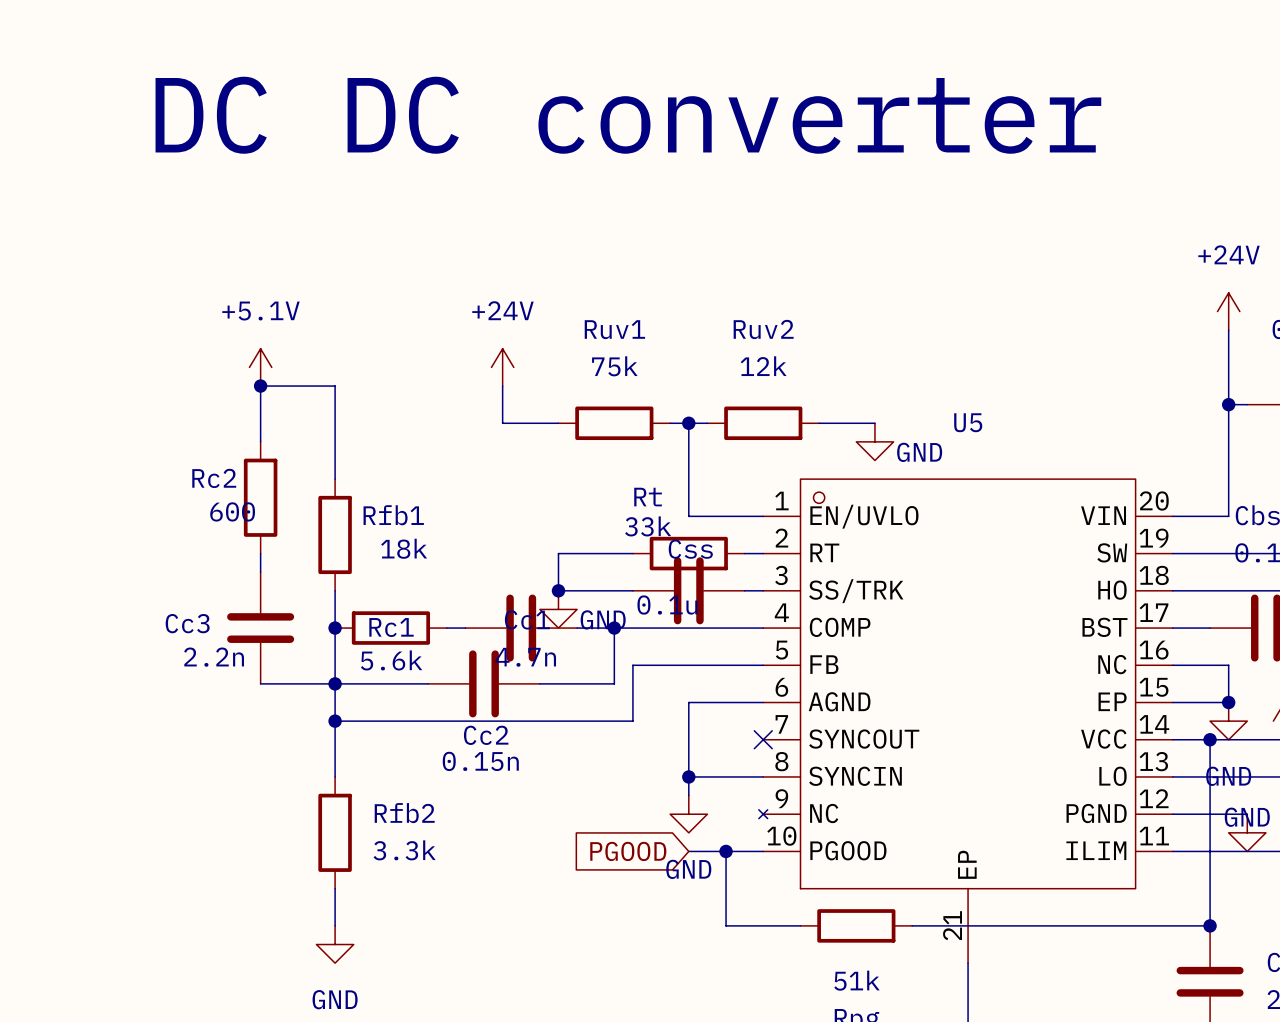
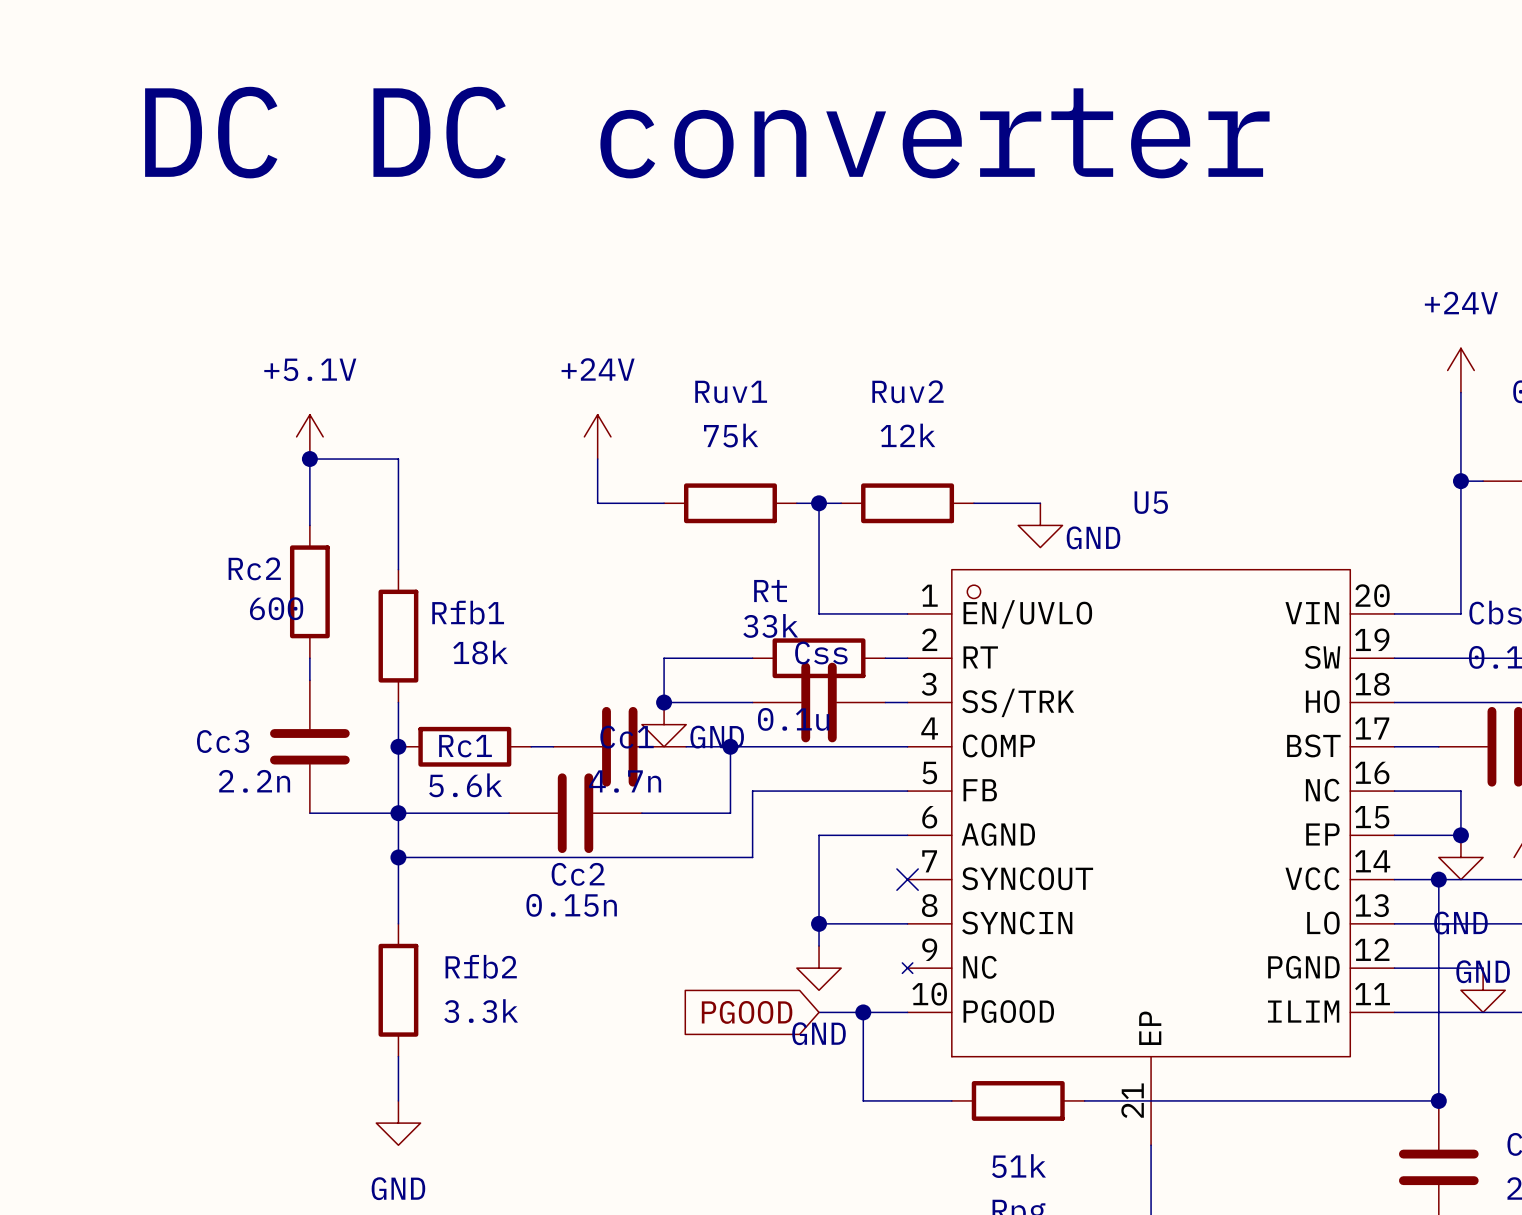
text position: DC DC converter (628, 115) -> DC DC converter (707, 132)

